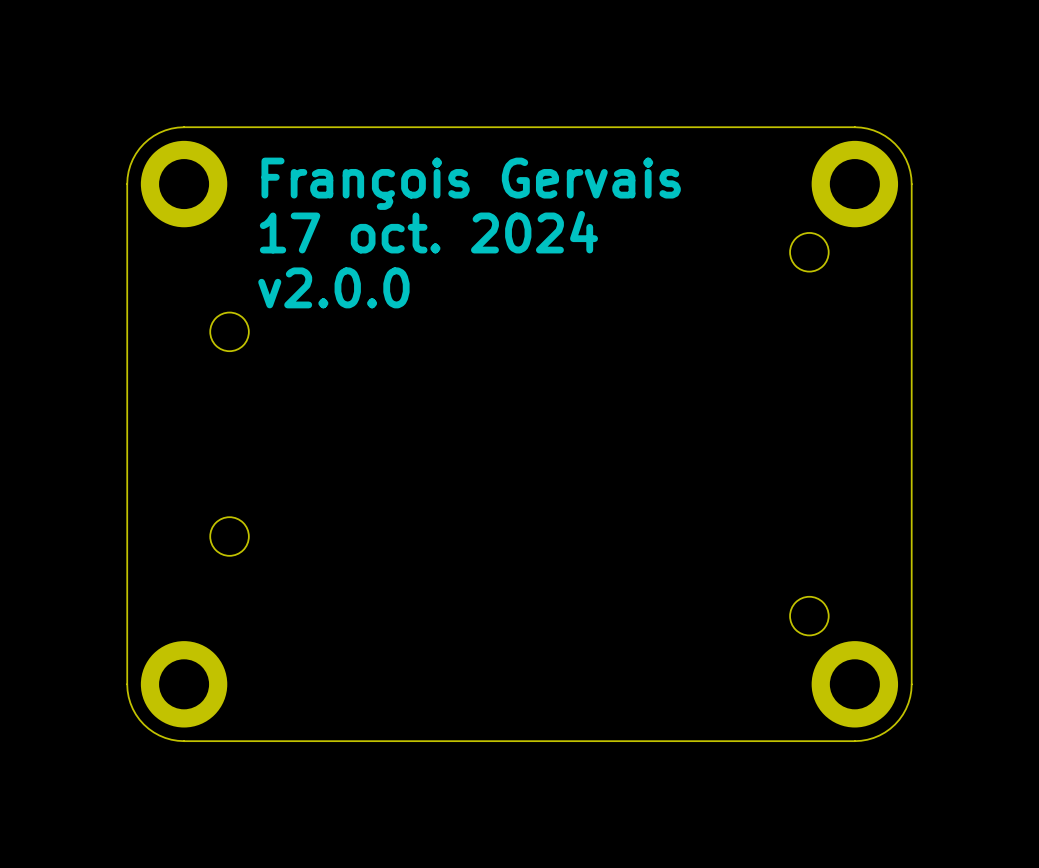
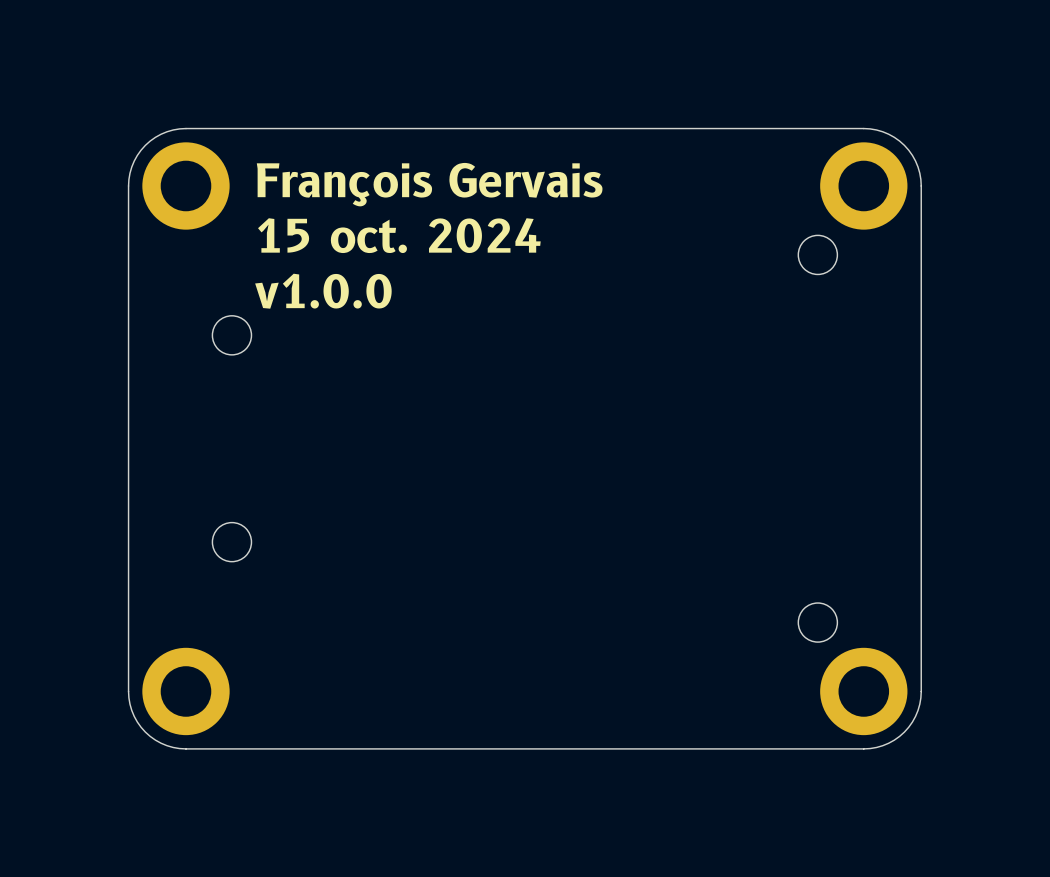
text: 17 oct. 2024 (428, 232) -> 15 oct. 2024 (399, 235)
text: v2.0.0 (333, 287) -> v1.0.0 (323, 291)

